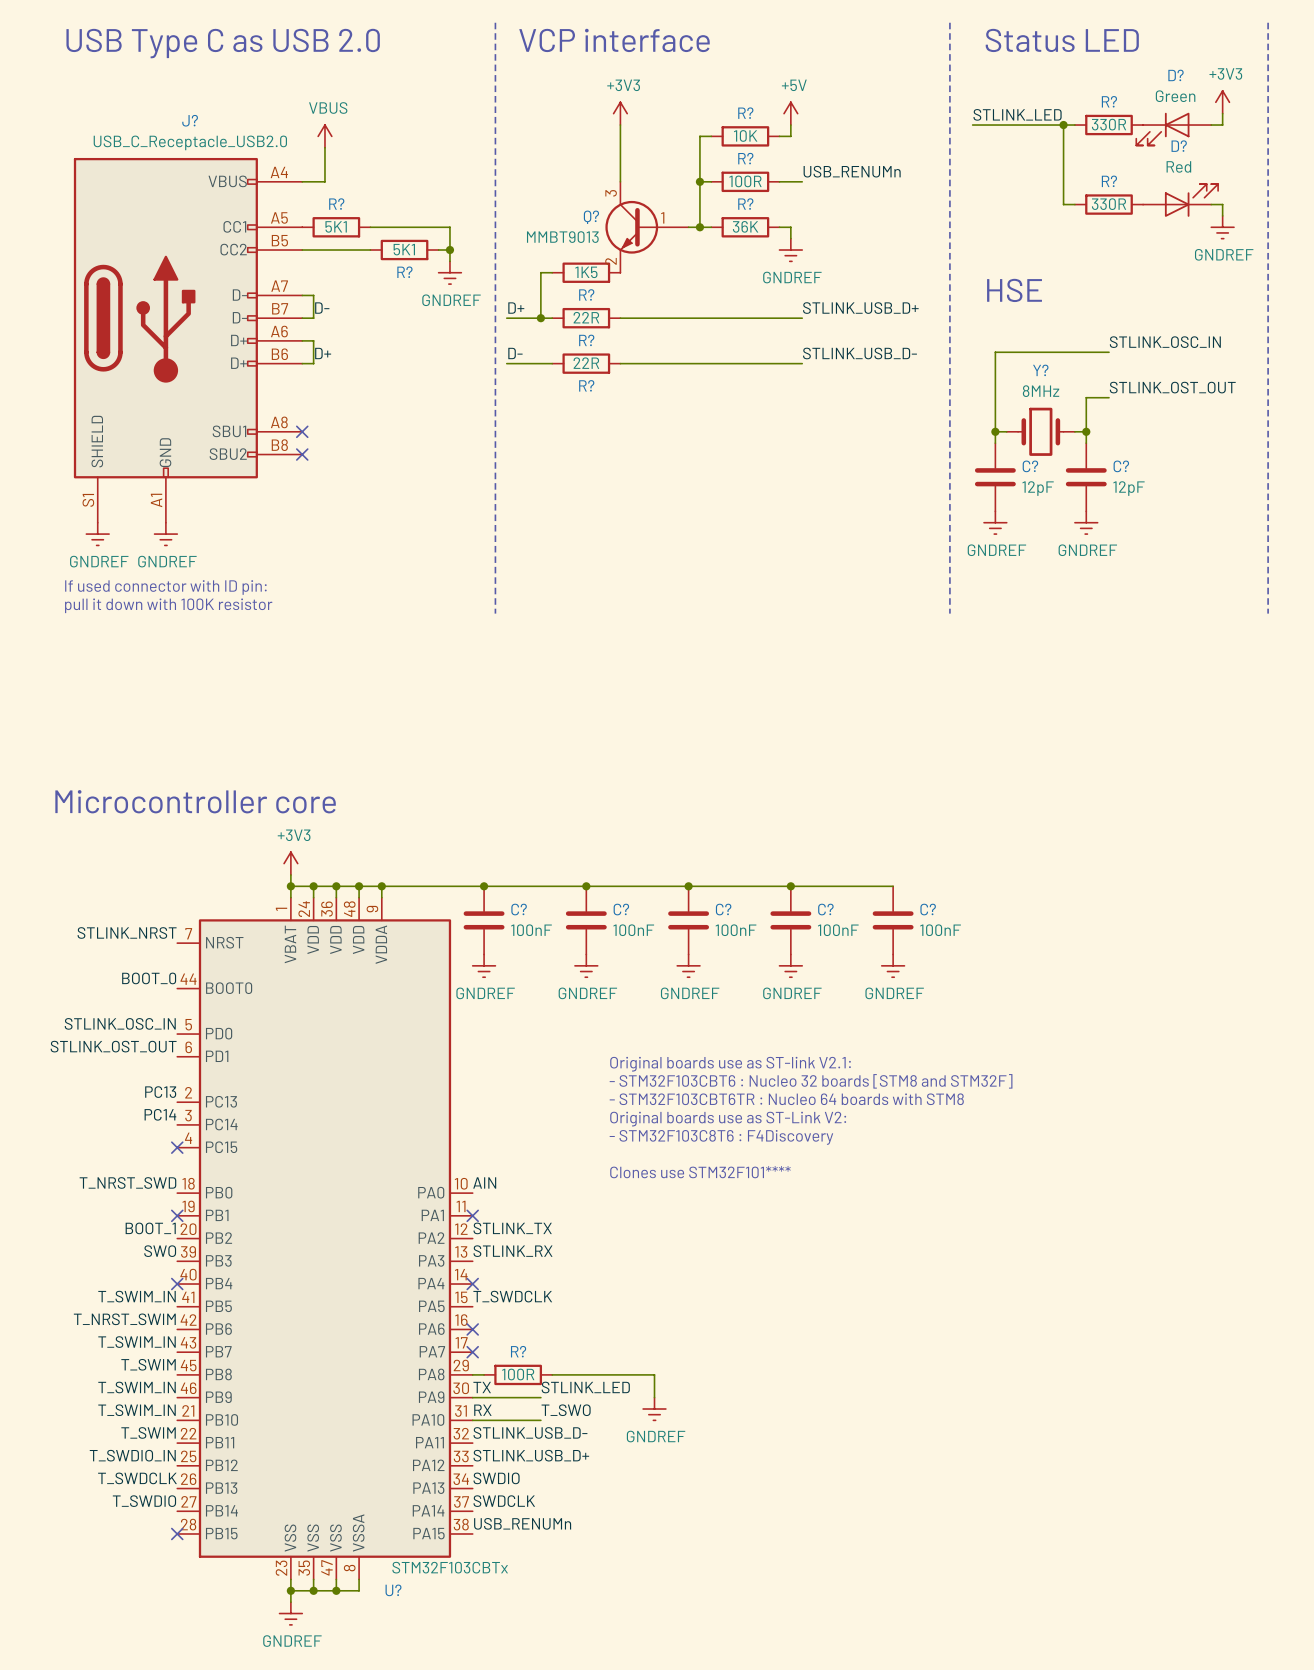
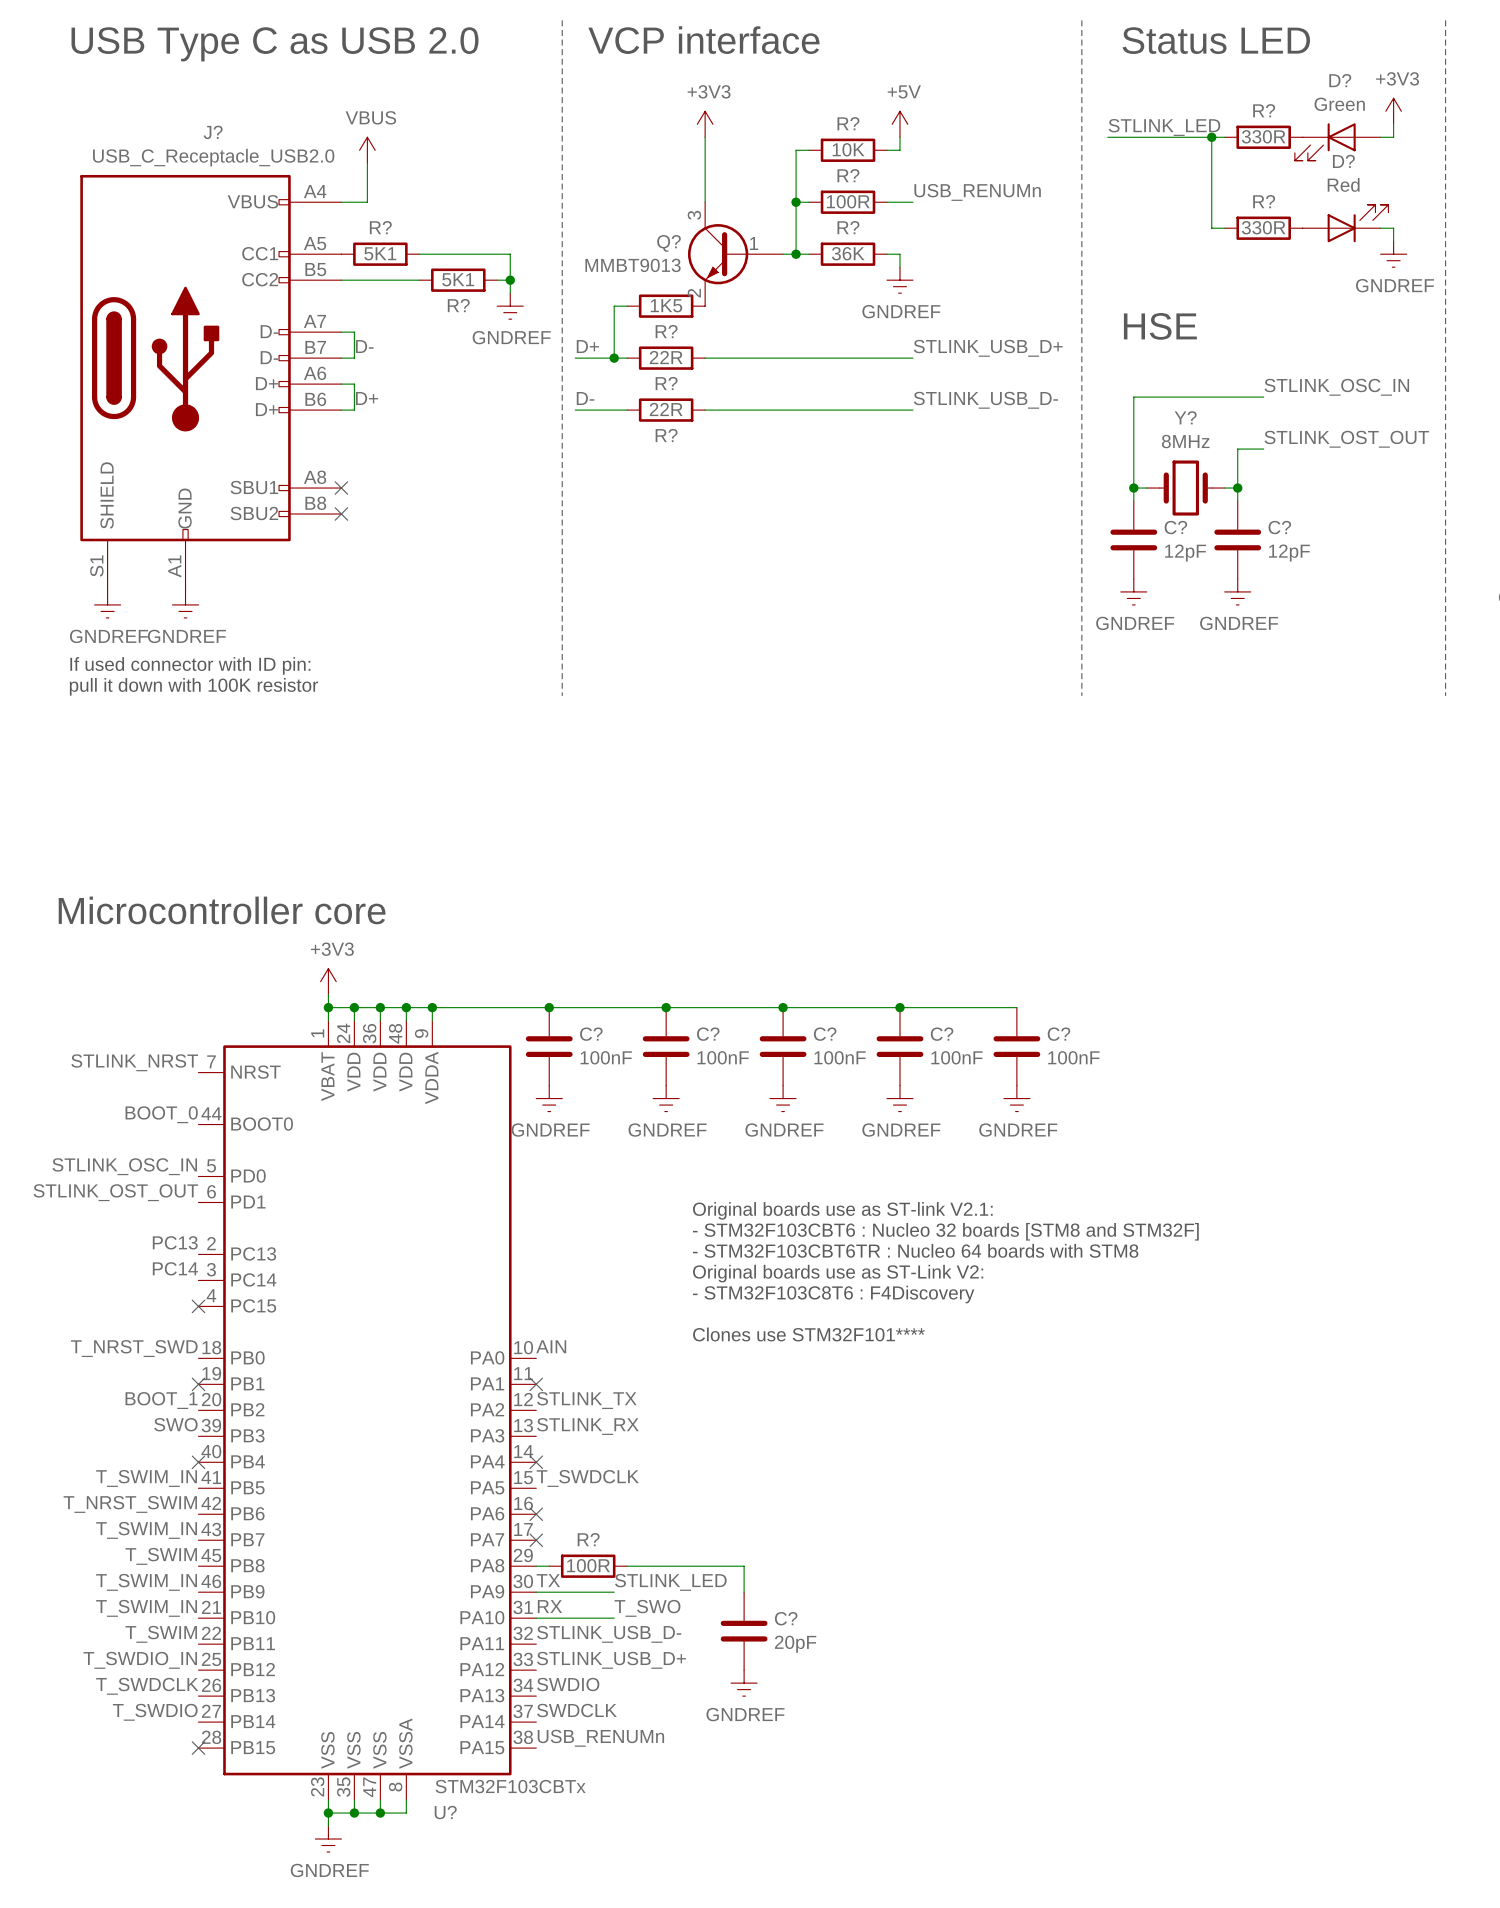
power symbol position: GNDREF (654, 1409) -> GNDREF (744, 1683)
C?: none -> 20pF (744, 1631)

